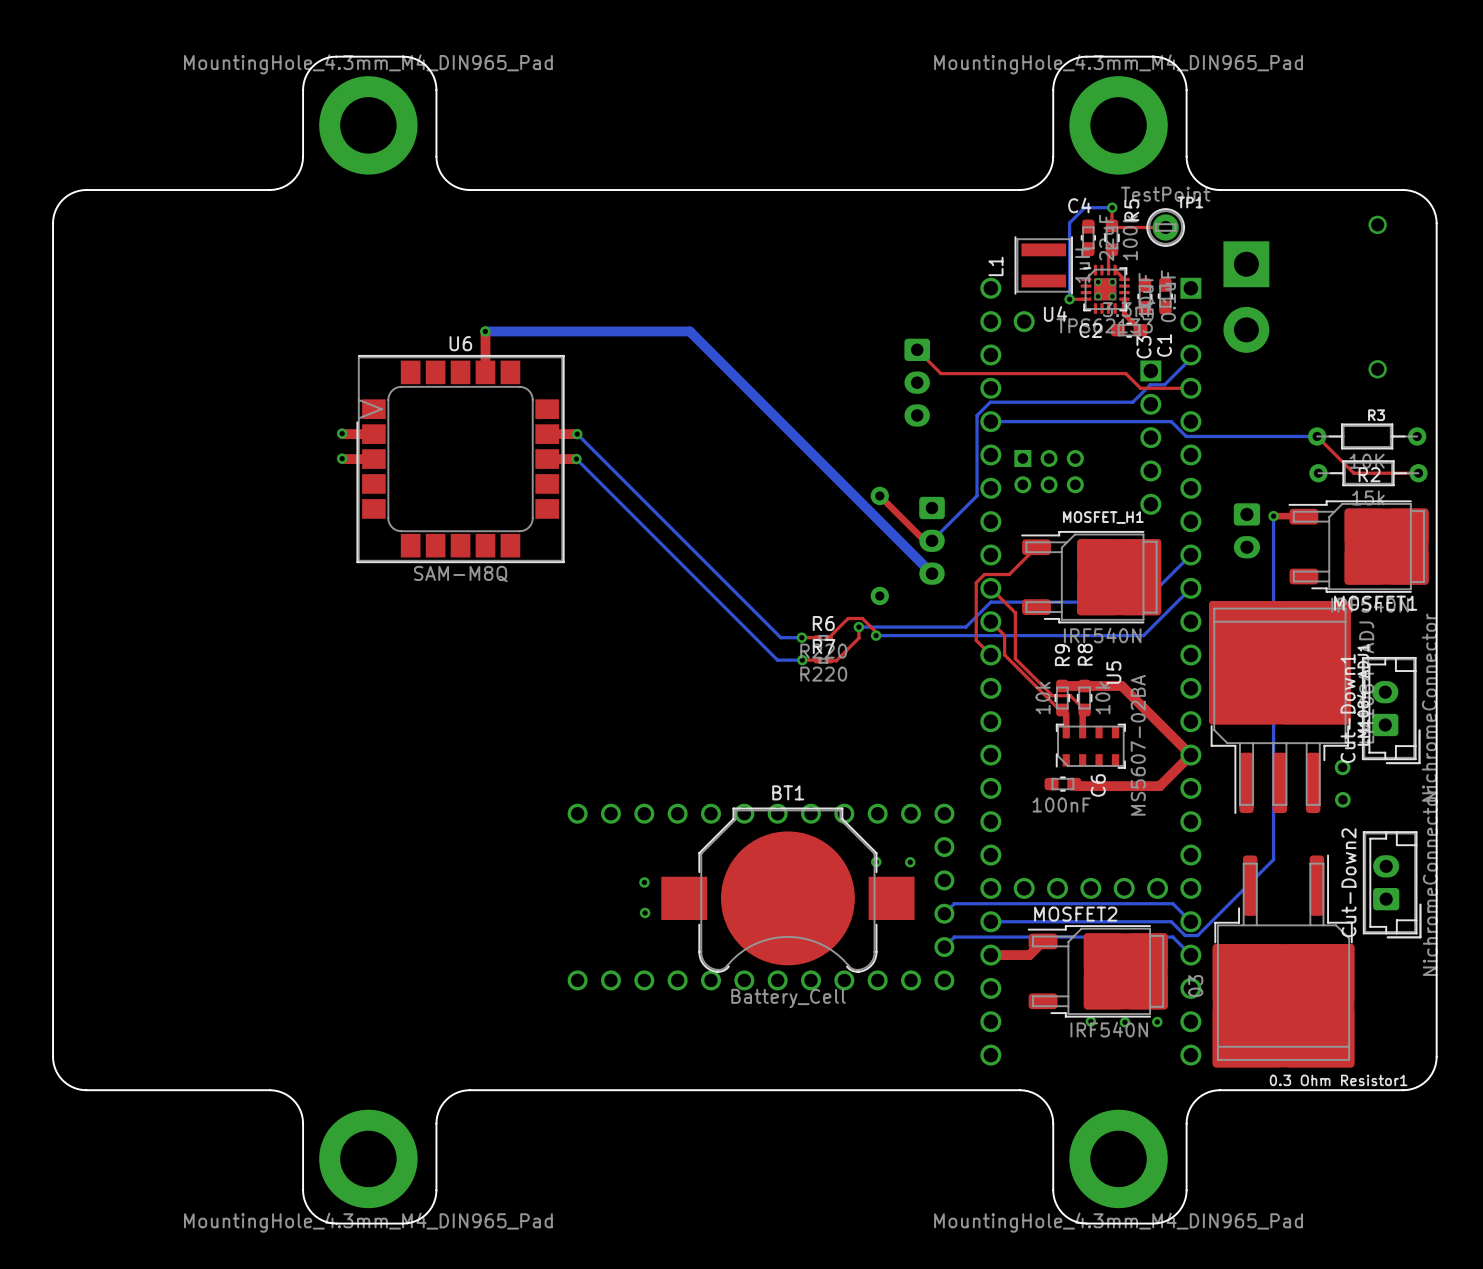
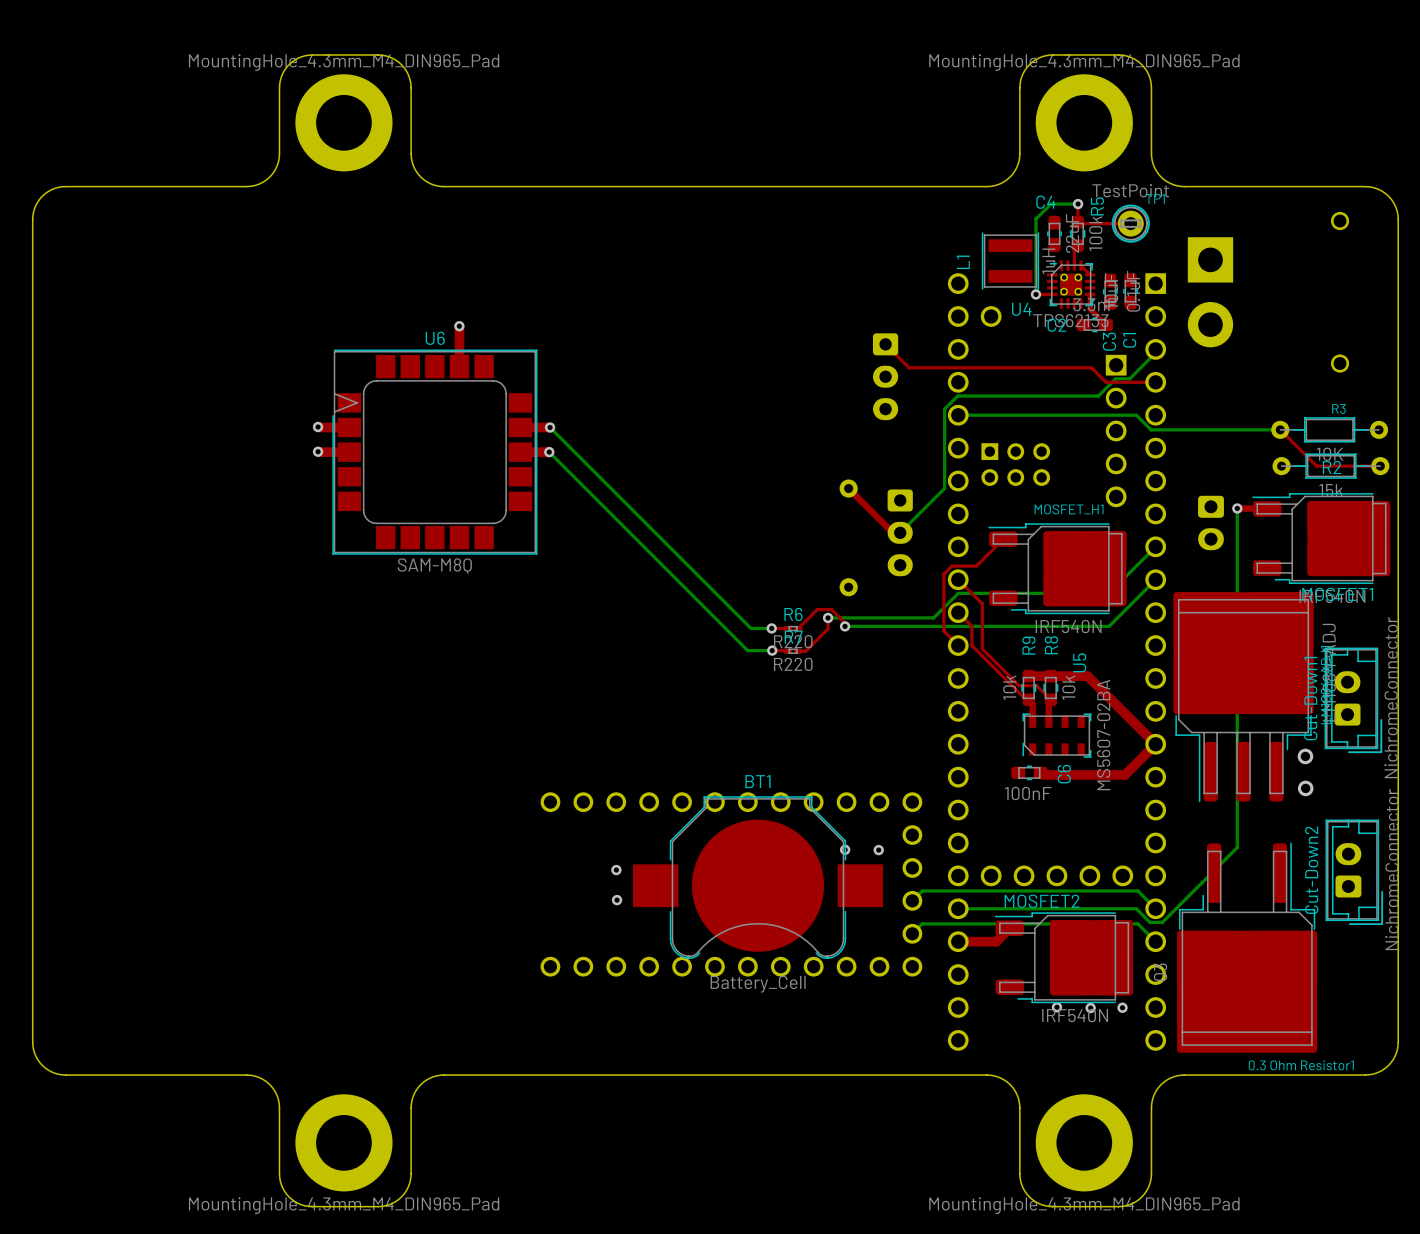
bottom track: (485, 331) (689, 331) (932, 573) -> none

